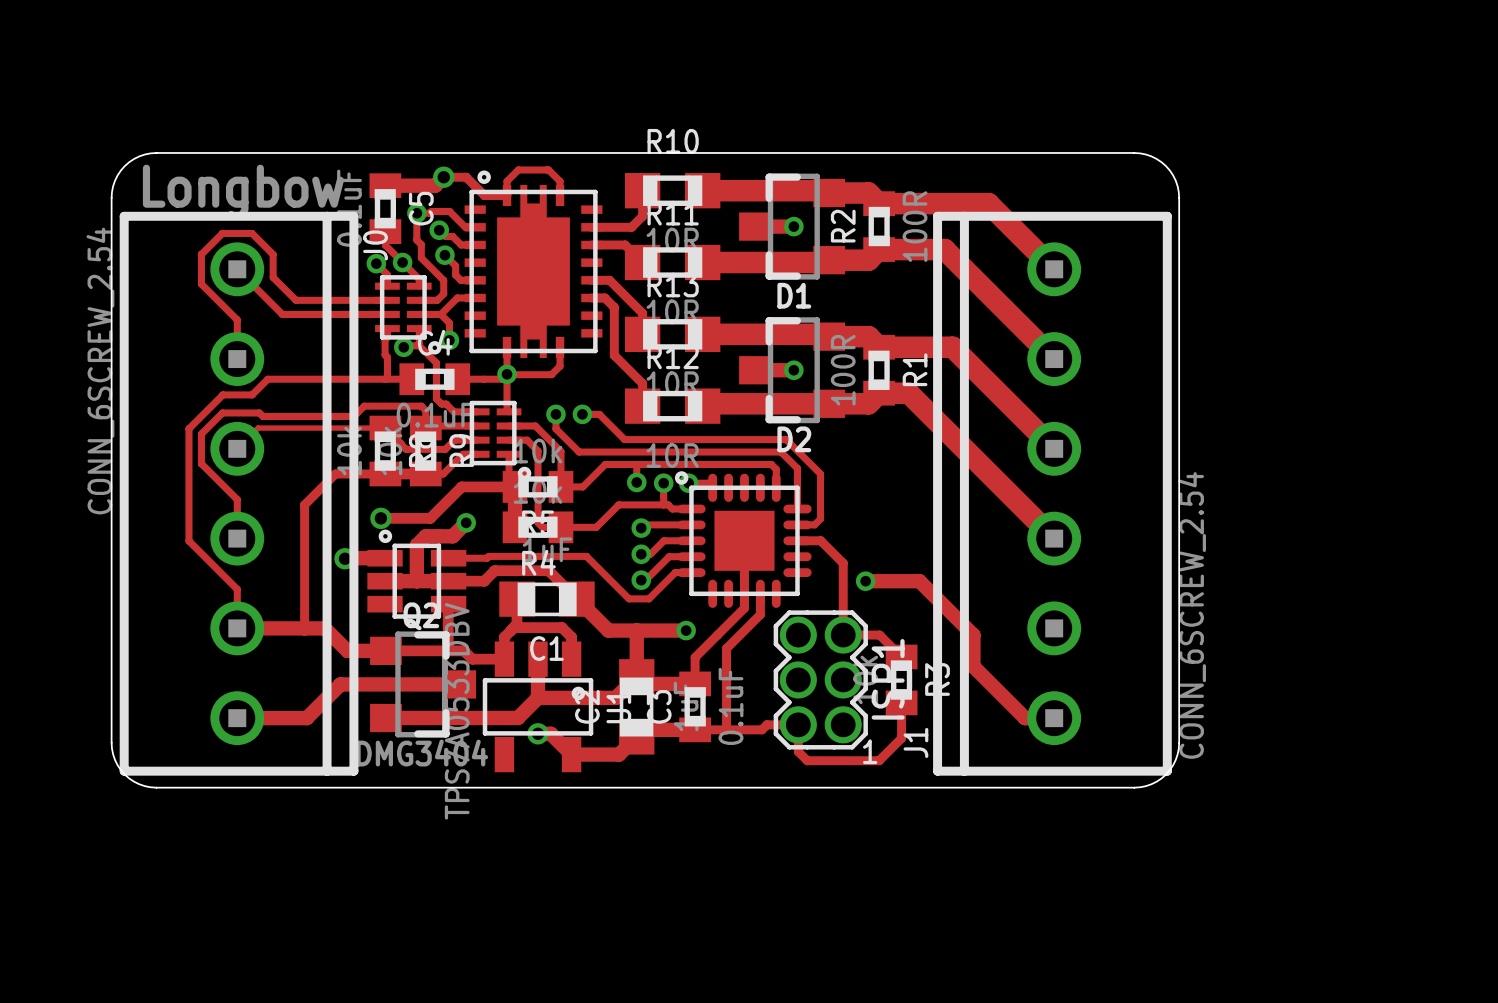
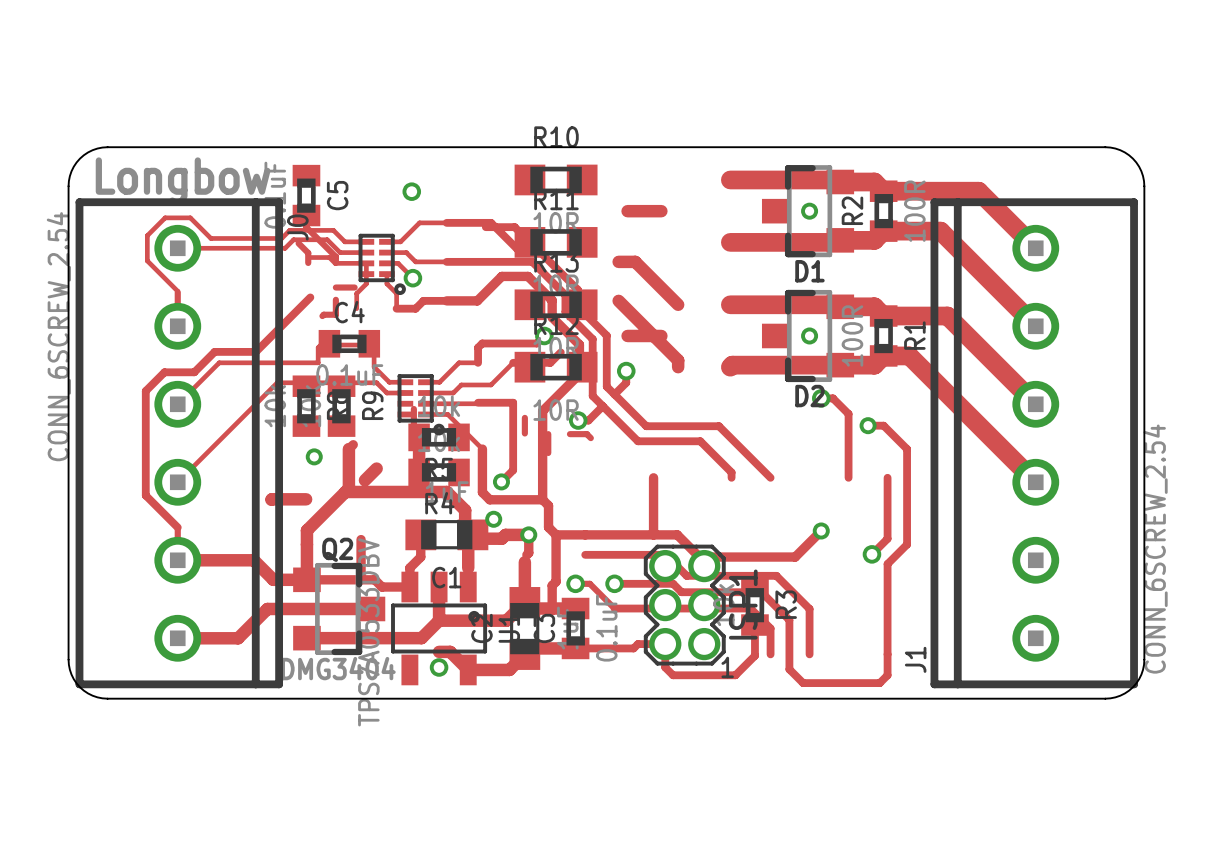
board edge: (1134, 152) (1151, 156) (1166, 166) (1175, 180) (1179, 197) (1178, 748) (1173, 765) (1161, 778) (1145, 786) (1134, 787) -> (957, 147) (1115, 148) (1124, 152) (1136, 162) (1143, 176) (1144, 186) (1144, 659) (1141, 674) (1129, 690) (1110, 698) (957, 698)
via position: (443, 177) -> (411, 191)
track: (385, 185) (435, 185) (443, 177) (466, 177) (484, 195) (507, 195) (507, 181) (518, 169) (548, 169) (560, 181) (560, 195) -> none
track: (642, 190) (642, 216) (631, 227) (591, 227) -> none
track: (702, 190) (826, 190) (829, 193) (868, 193) (879, 203) (988, 203) (1054, 269) -> (730, 179) (838, 179) (840, 182) (874, 182) (883, 191) (978, 191) (1035, 248)
via: (416, 213) -> none
D1 position: (792, 226) -> (808, 211)
via: (793, 226) -> none
R2 position: (879, 226) -> (883, 211)
via: none -> (809, 211)
track: (475, 227) (465, 227) (449, 211) (416, 213) (416, 240) (421, 244) (421, 258) (443, 280) (443, 293) (437, 300) (419, 300) -> none
track: (439, 230) (445, 236) (452, 236) (461, 244) (475, 244) -> none
via: (439, 230) -> none
track: (444, 255) (455, 265) (455, 275) (460, 280) (475, 280) -> none
via: (444, 255) -> none
track: none -> (386, 241) (400, 241) (419, 222) (491, 222) (517, 249) (537, 249) (577, 289) (577, 306) (606, 335) (606, 386) (646, 426) (718, 426) (770, 477)
via: (402, 262) -> none
track: (702, 262) (826, 262) (829, 260) (868, 260) (879, 249) (944, 249) (1054, 359) -> (730, 242) (838, 242) (840, 240) (874, 240) (883, 231) (940, 231) (1035, 326)
via: (376, 263) -> none
part: (533, 264) -> none
track: (237, 269) (282, 314) (387, 314) -> (177, 248) (285, 248) (293, 239) (327, 239) (340, 252) (366, 252)
track: none -> (386, 252) (406, 252) (415, 261) (532, 261) (565, 295) (565, 311) (592, 339) (592, 396) (637, 441) (700, 441) (731, 472) (731, 477)
track: none -> (310, 257) (329, 257) (335, 263) (366, 263) (366, 283) (356, 293) (356, 308)
track: (591, 280) (609, 280) (642, 313) (642, 334) -> none
track: none -> (618, 261) (635, 261) (678, 304)
track: none -> (386, 263) (398, 263) (412, 278)
part: none -> (382, 264)
track: (475, 297) (457, 297) (440, 314) (449, 323) (449, 340) -> none
track: (591, 297) (604, 297) (614, 307) (614, 355) (642, 383) (642, 406) -> none
track: none -> (386, 274) (386, 283) (396, 293) (396, 308) (415, 308) (423, 300) (477, 300) (501, 276) (528, 276) (552, 300) (552, 317) (579, 344) (579, 374) (542, 411) (542, 499)
track: (387, 300) (296, 300) (273, 277) (273, 254) (252, 233) (222, 233) (201, 254) (201, 284) (237, 320) -> (366, 241) (344, 241) (333, 230) (289, 230) (281, 238) (210, 238) (190, 217) (165, 217) (147, 235) (147, 260) (177, 292)
via: none -> (412, 278)
part: (408, 314) -> none
track: (387, 328) (387, 337) (385, 339) (387, 377) (385, 379) -> none
track: none -> (618, 300) (678, 360) (678, 367)
track: (702, 334) (826, 334) (829, 336) (868, 336) (879, 347) (952, 347) (1054, 448) -> (730, 304) (838, 304) (840, 306) (874, 306) (883, 316) (947, 316) (1035, 404)
via: (449, 340) -> none
track: (419, 345) (436, 362) (436, 398) (441, 404) (446, 404) (453, 411) (477, 411) -> none
via: (403, 347) -> none
track: (507, 347) (507, 409) (509, 411) -> none
track: (560, 347) (560, 366) (551, 374) (506, 374) -> none
track: none -> (544, 335) (536, 343) (482, 343) (478, 347) (478, 362) (459, 362) (439, 382) (425, 382)
via: none -> (544, 335)
D2 position: (792, 370) -> (808, 335)
via: (793, 370) -> none
R1 position: (879, 370) -> (883, 335)
via: none -> (809, 335)
track: (507, 374) (502, 379) (457, 379) -> none
via: (507, 374) -> none
track: (411, 379) (267, 379) (252, 394) (222, 394) (188, 428) (188, 541) (237, 590) -> (310, 297) (255, 351) (214, 351) (194, 372) (164, 372) (145, 391) (145, 495) (177, 527)
track: none -> (560, 352) (550, 362) (513, 362) (491, 384) (461, 384) (453, 393) (425, 393)
part footprint: [464, 400, 532, 481] -> [397, 374, 445, 436]
track: (702, 406) (705, 403) (868, 403) (879, 393) (908, 393) (1054, 538) -> (730, 367) (732, 365) (874, 365) (883, 355) (909, 355) (1035, 482)
track: none -> (626, 371) (626, 382) (614, 394)
via: none -> (626, 371)
track: (555, 414) (555, 428) (579, 452) (781, 452) (797, 468) (797, 508) -> none
via: (555, 414) -> none
track: (582, 414) (599, 414) (624, 439) (786, 439) (820, 473) (820, 519) (814, 524) (797, 524) -> none
via: (582, 414) -> none
track: (477, 426) (427, 426) (425, 428) (425, 410) (421, 406) (364, 406) (353, 416) (262, 416) (259, 412) (222, 412) (201, 433) (201, 463) (237, 499) (237, 538) -> (405, 393) (386, 393) (376, 382) (277, 382) (177, 482)
track: (509, 426) (535, 426) (560, 451) (560, 486) (582, 486) (605, 464) (771, 464) (776, 469) (776, 487) -> none
track: (258, 428) (385, 428) (400, 443) -> (195, 386) (219, 362) (318, 362) (318, 347) (320, 345) (369, 345) (374, 349) (374, 366) (389, 382) (405, 382)
track: (477, 440) (454, 440) (445, 449) (406, 449) (400, 444) -> none
track: (509, 440) (527, 440) (538, 451) (538, 522) (542, 527) (596, 527) (618, 504) (668, 504) (672, 508) (691, 508) -> none
track: none -> (821, 398) (832, 398) (848, 413) (848, 477)
via: none -> (821, 398)
track: none -> (425, 403) (513, 402) (513, 470) (501, 481)
track: none -> (602, 406) (588, 420) (578, 420)
track: (477, 454) (462, 454) (443, 474) (335, 474) (304, 504) (304, 628) -> none
track: none -> (425, 414) (447, 414) (482, 449) (482, 492) (489, 499) (542, 499)
track: none -> (868, 425) (883, 425) (907, 449) (907, 544) (887, 564) (887, 675) (879, 683) (803, 683) (789, 669) (789, 620) (761, 592) (681, 592) (673, 583) (614, 583)
via: none -> (868, 425)
via: (636, 482) -> none
via: (663, 483) -> none
via position: (688, 483) -> (578, 420)
track: (515, 486) (461, 486) (430, 518) (380, 518) -> none
J1 position: (1052, 493) -> (1034, 443)
track: none -> (353, 444) (348, 449) (348, 488) (306, 530) (306, 579)
via position: (380, 518) -> (314, 456)
via: (466, 522) -> none
track: (691, 524) (644, 524) (641, 528) -> none
via: (641, 528) -> none
track: none -> (653, 477) (653, 534)
track: none -> (887, 477) (887, 538) (871, 554)
track: (439, 536) (452, 536) (425, 536) (416, 545) (416, 581) -> none
via: none -> (501, 481)
part: (743, 539) -> none
track: (691, 540) (663, 540) (650, 554) (641, 554) -> none
track: (744, 540) (744, 608) (695, 657) (695, 683) -> none
track: (797, 540) (820, 540) (843, 563) (843, 635) (879, 635) (901, 656) -> none
via: (641, 554) -> none
track: (691, 556) (669, 556) (645, 580) (641, 580) -> none
via: (345, 558) -> none
track: (448, 558) (586, 556) (629, 598) (649, 598) (675, 572) (691, 572) -> none
track: none -> (542, 499) (548, 505) (548, 527) (556, 534)
part: (416, 574) -> none
via position: (641, 580) -> (528, 534)
track: (385, 581) (484, 581) (494, 570) (548, 570) (608, 630) (686, 630) -> none
via: none -> (493, 519)
track: (865, 581) (919, 581) (973, 635) (973, 666) (1025, 718) (1054, 718) -> none
via: (865, 581) -> none
track: (760, 593) (760, 614) (726, 648) (726, 729) -> none
track: none -> (465, 530) (472, 538) (501, 538) (505, 534) (528, 534) (528, 552) (526, 554)
track: none -> (821, 530) (795, 557) (699, 557) (677, 534) (556, 534)
via: none -> (821, 530)
track: none -> (556, 534) (556, 581) (552, 585) (552, 608)
via: none -> (871, 554)
track: none -> (585, 554) (665, 554) (686, 575) (776, 575) (809, 608) (809, 654)
track: (514, 627) (561, 627) (571, 637) -> (345, 491) (446, 491) (465, 510) (465, 538) (468, 541) (468, 567)
via: (686, 630) -> none
track: none -> (575, 583) (589, 583) (614, 608) (750, 608) (770, 628) (770, 654)
via: none -> (575, 583)
via: none -> (614, 583)
via position: (538, 733) -> (439, 667)

